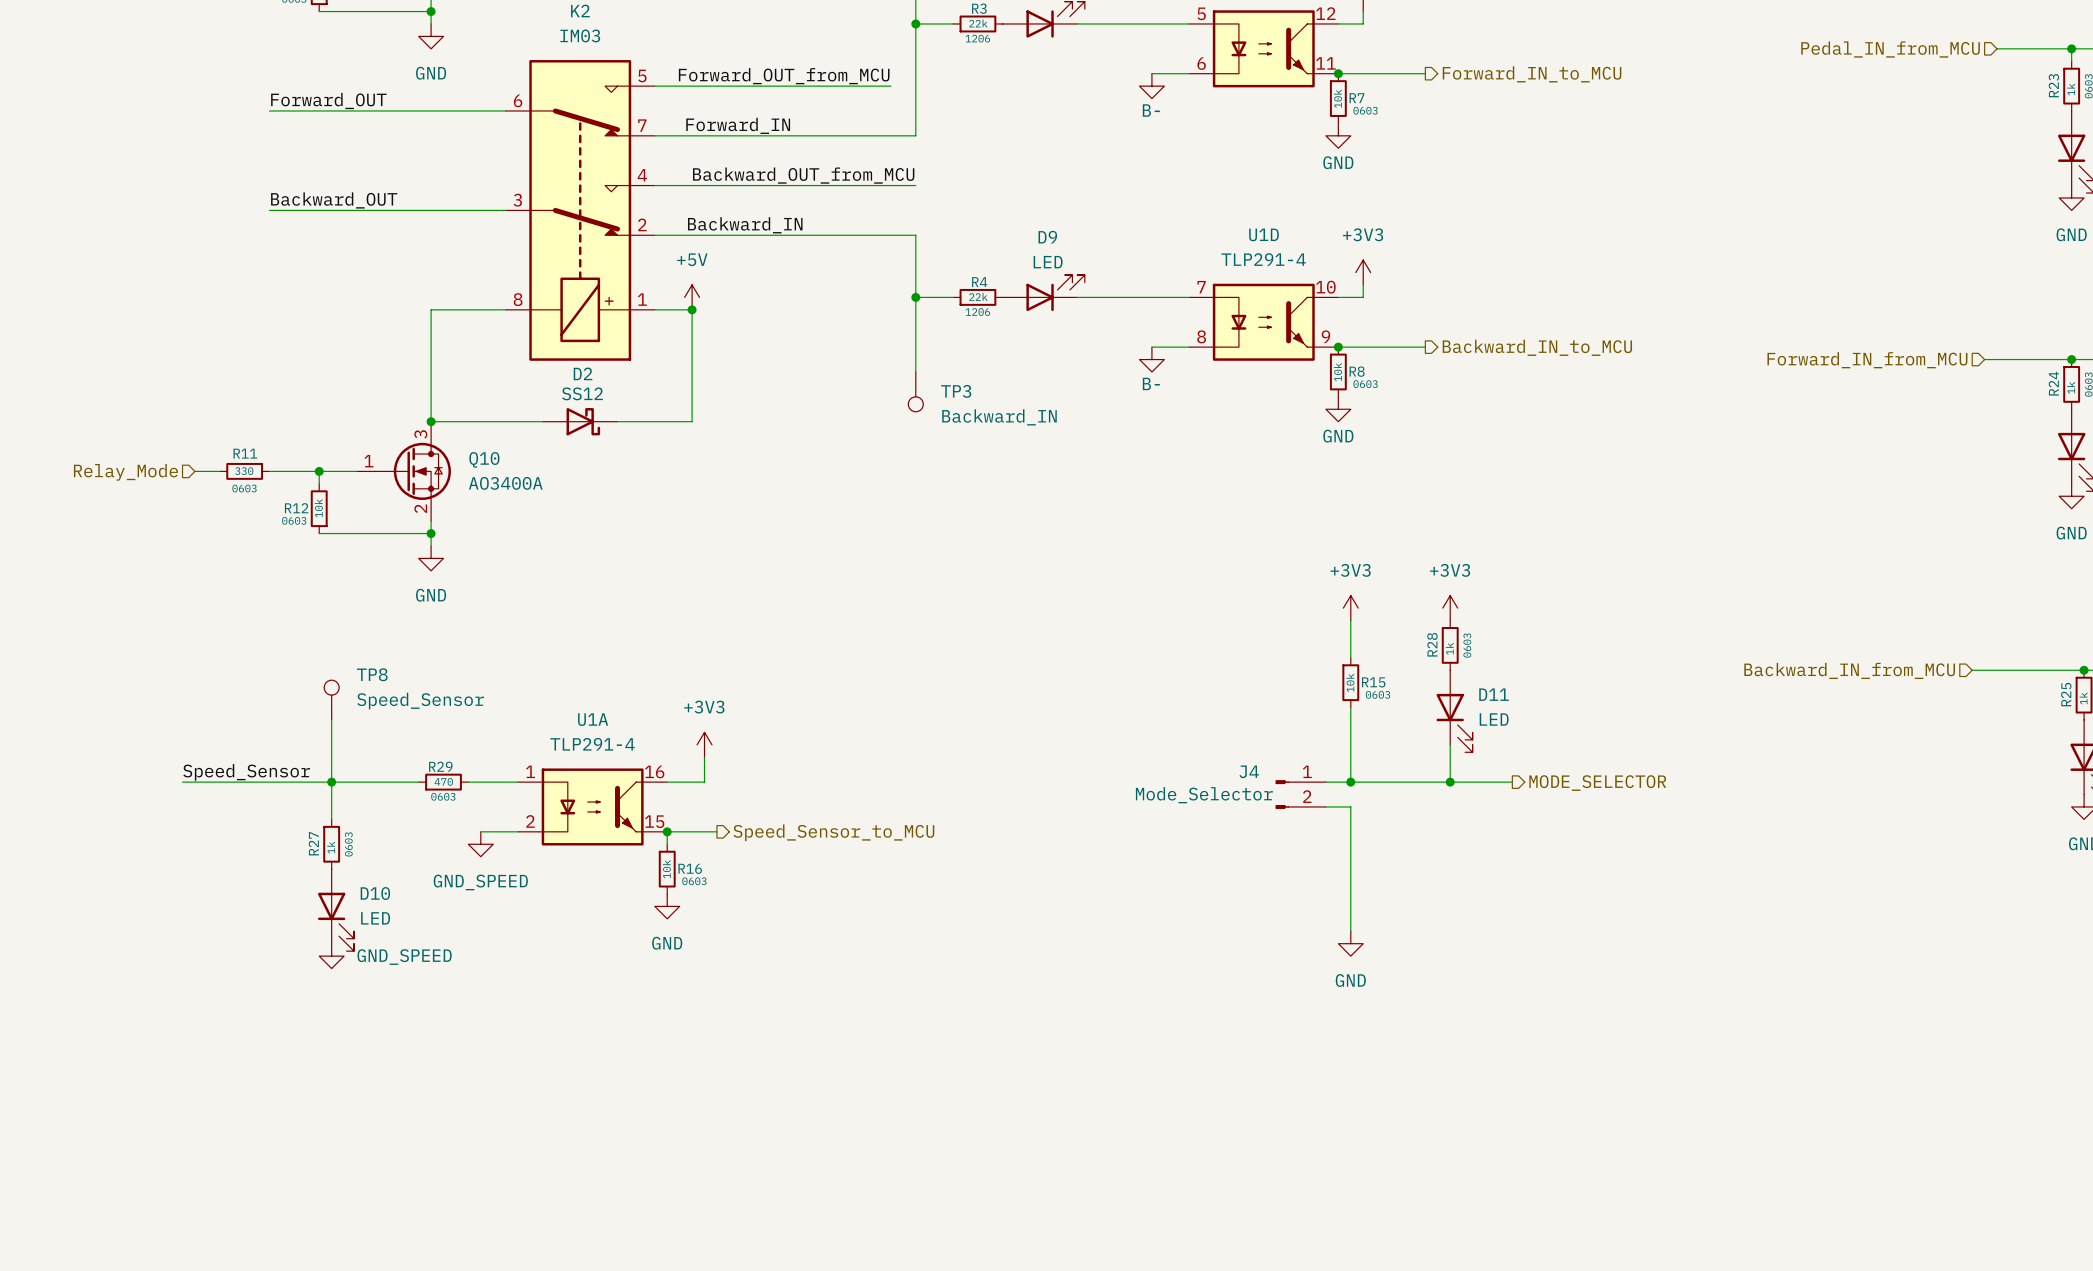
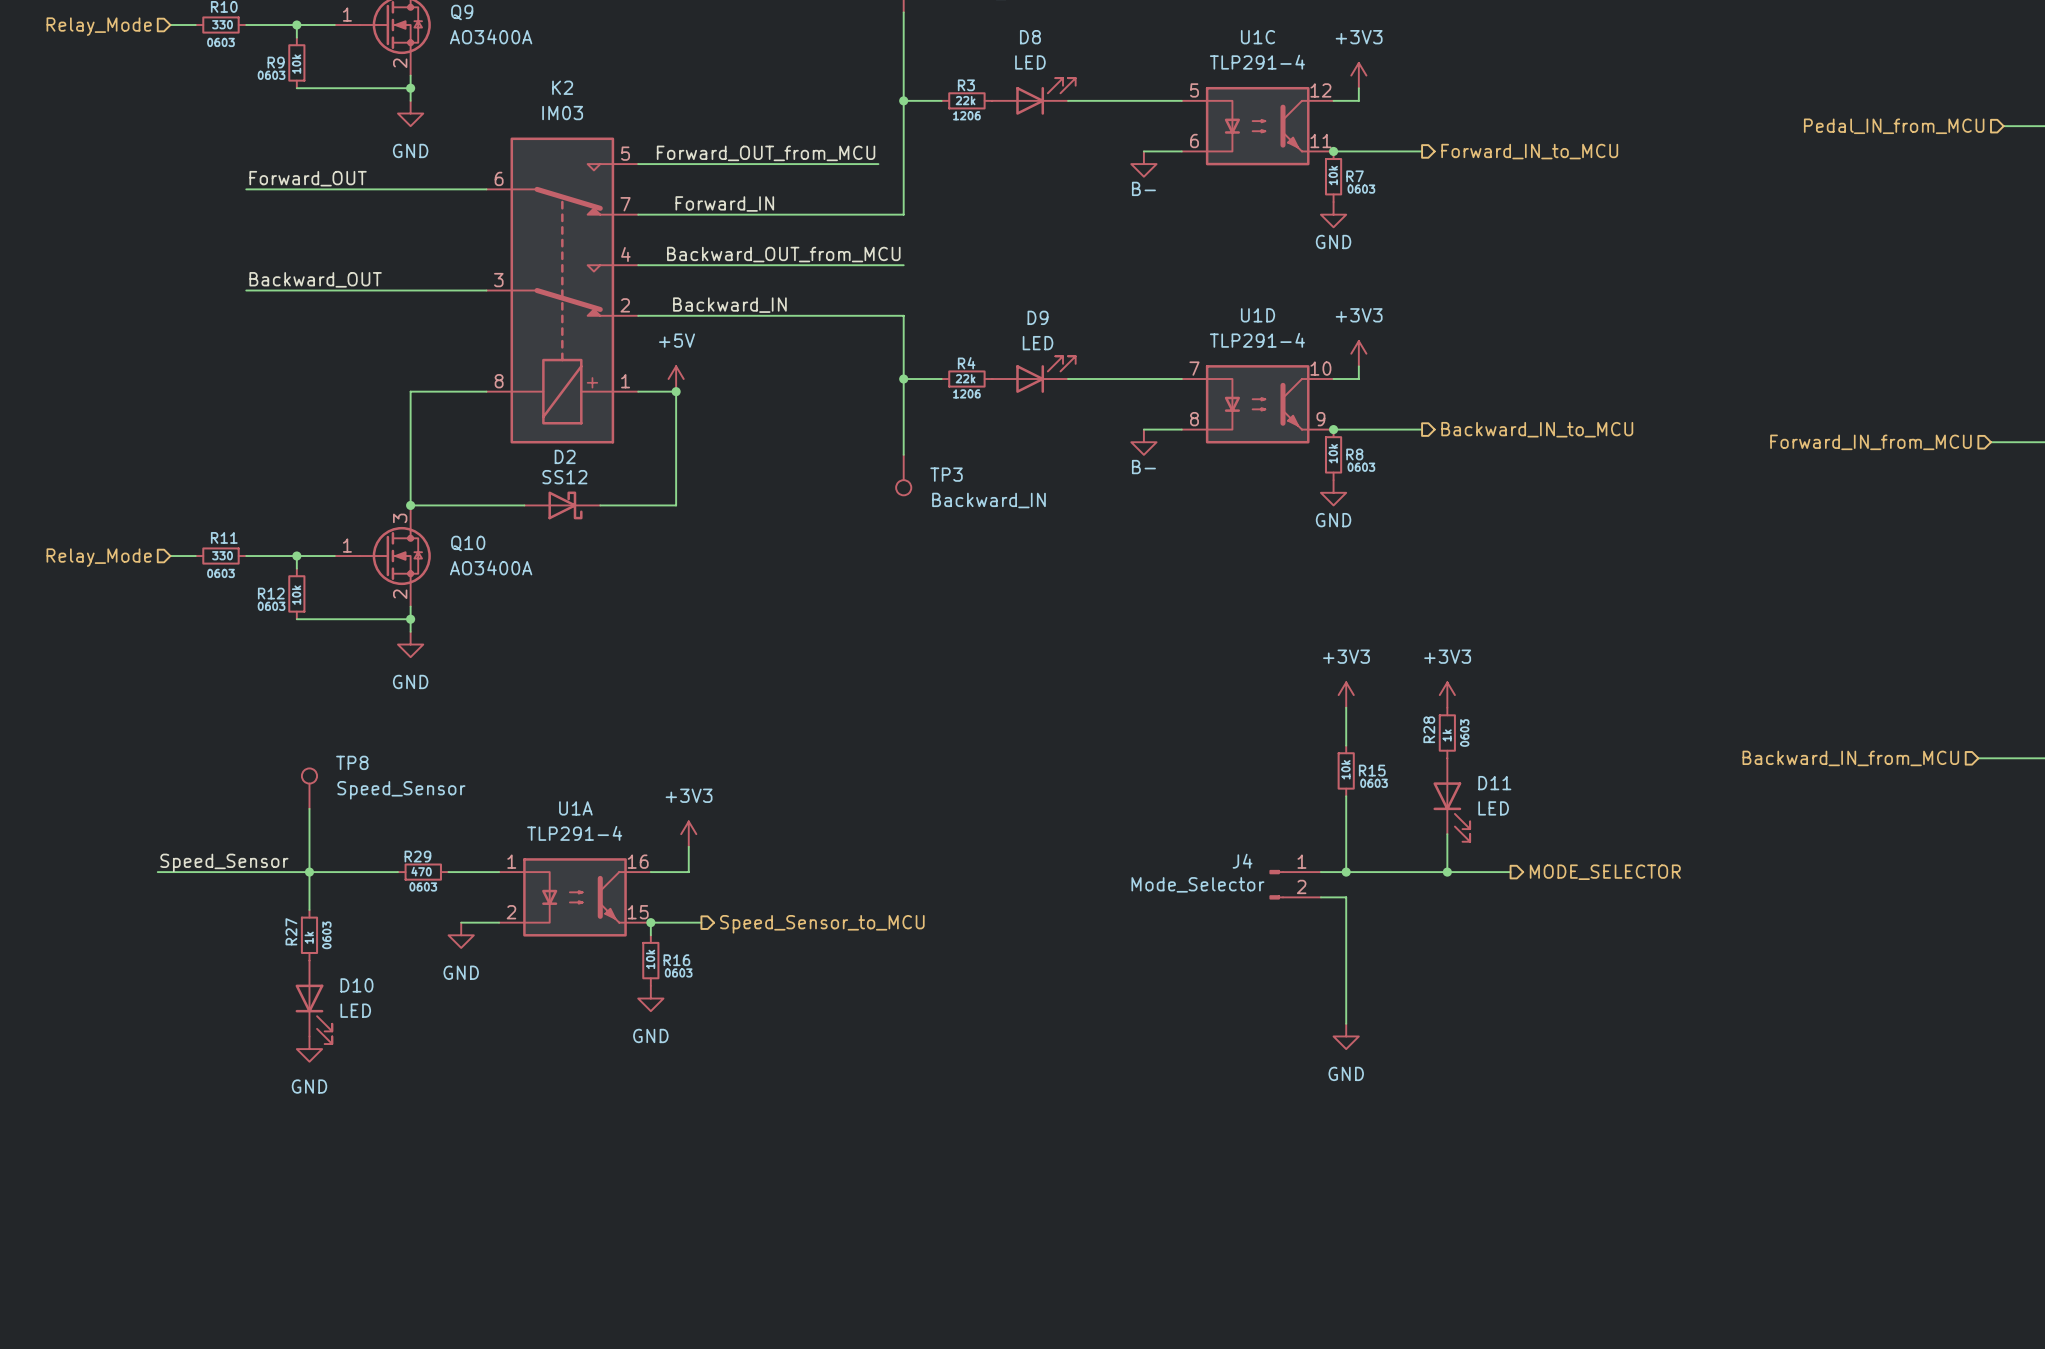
power symbol: GND_SPEED (480, 844) -> GND (461, 935)
power symbol: GND_SPEED (331, 956) -> GND (309, 1049)

